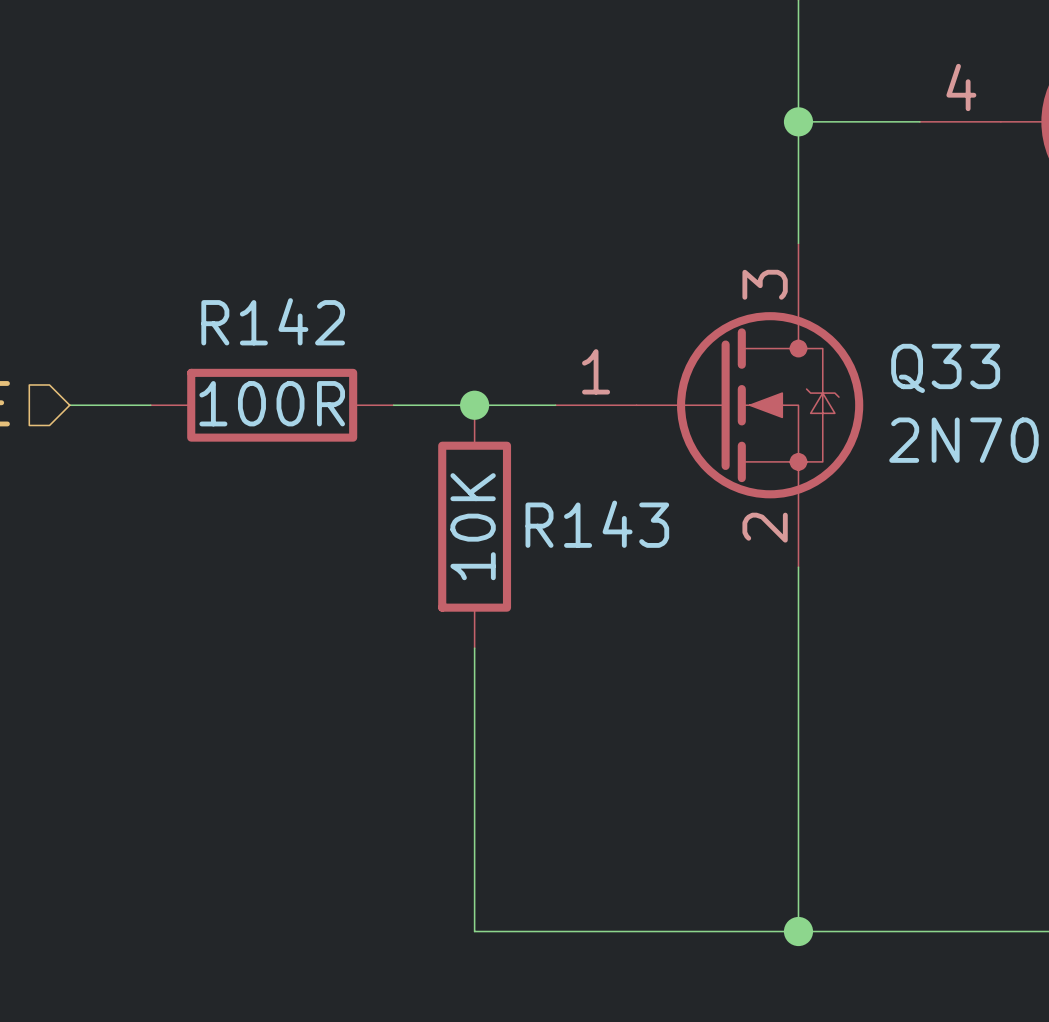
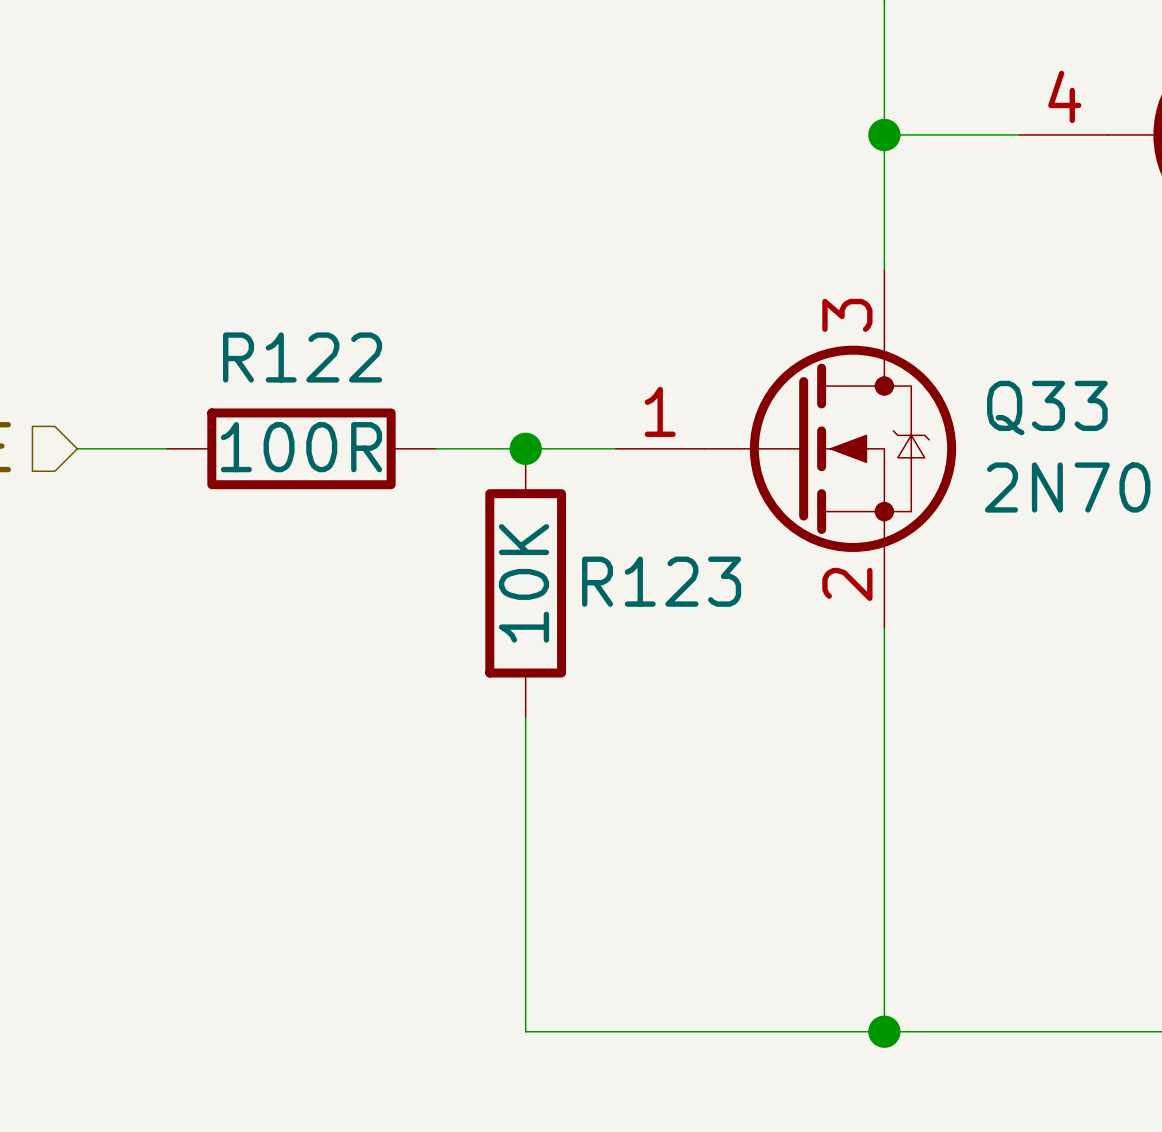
R142 name: R142 (273, 321) -> R122 (302, 357)
R143 name: R143 (597, 524) -> R123 (661, 581)

